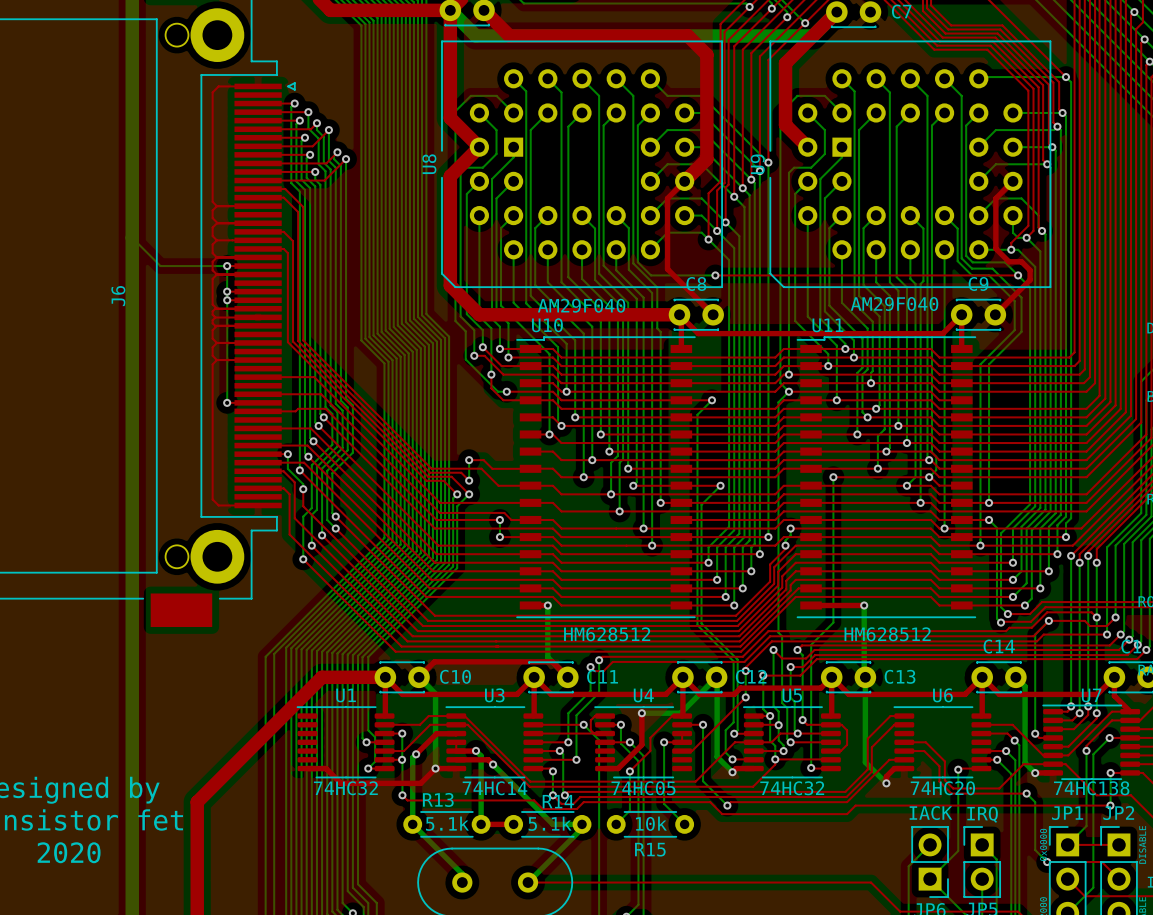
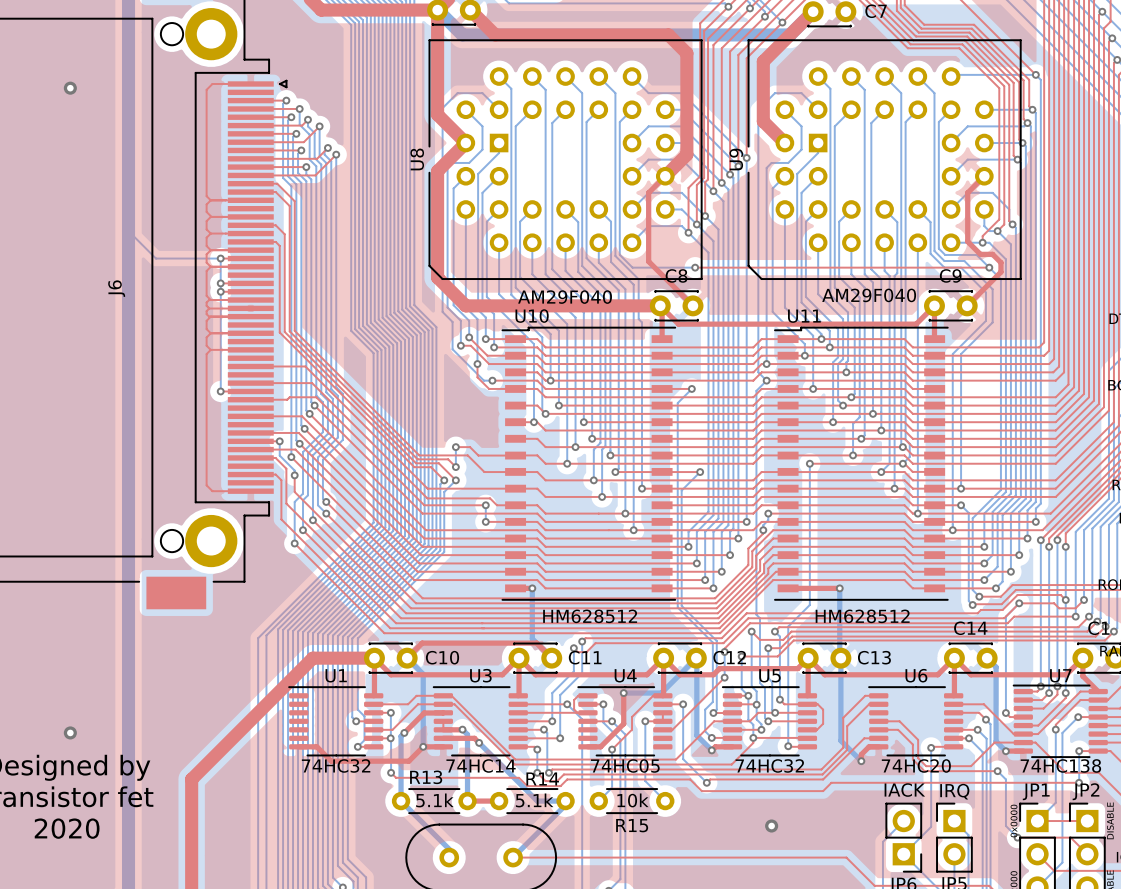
via: none -> (70, 88)
via: none -> (70, 732)
via: none -> (771, 826)

